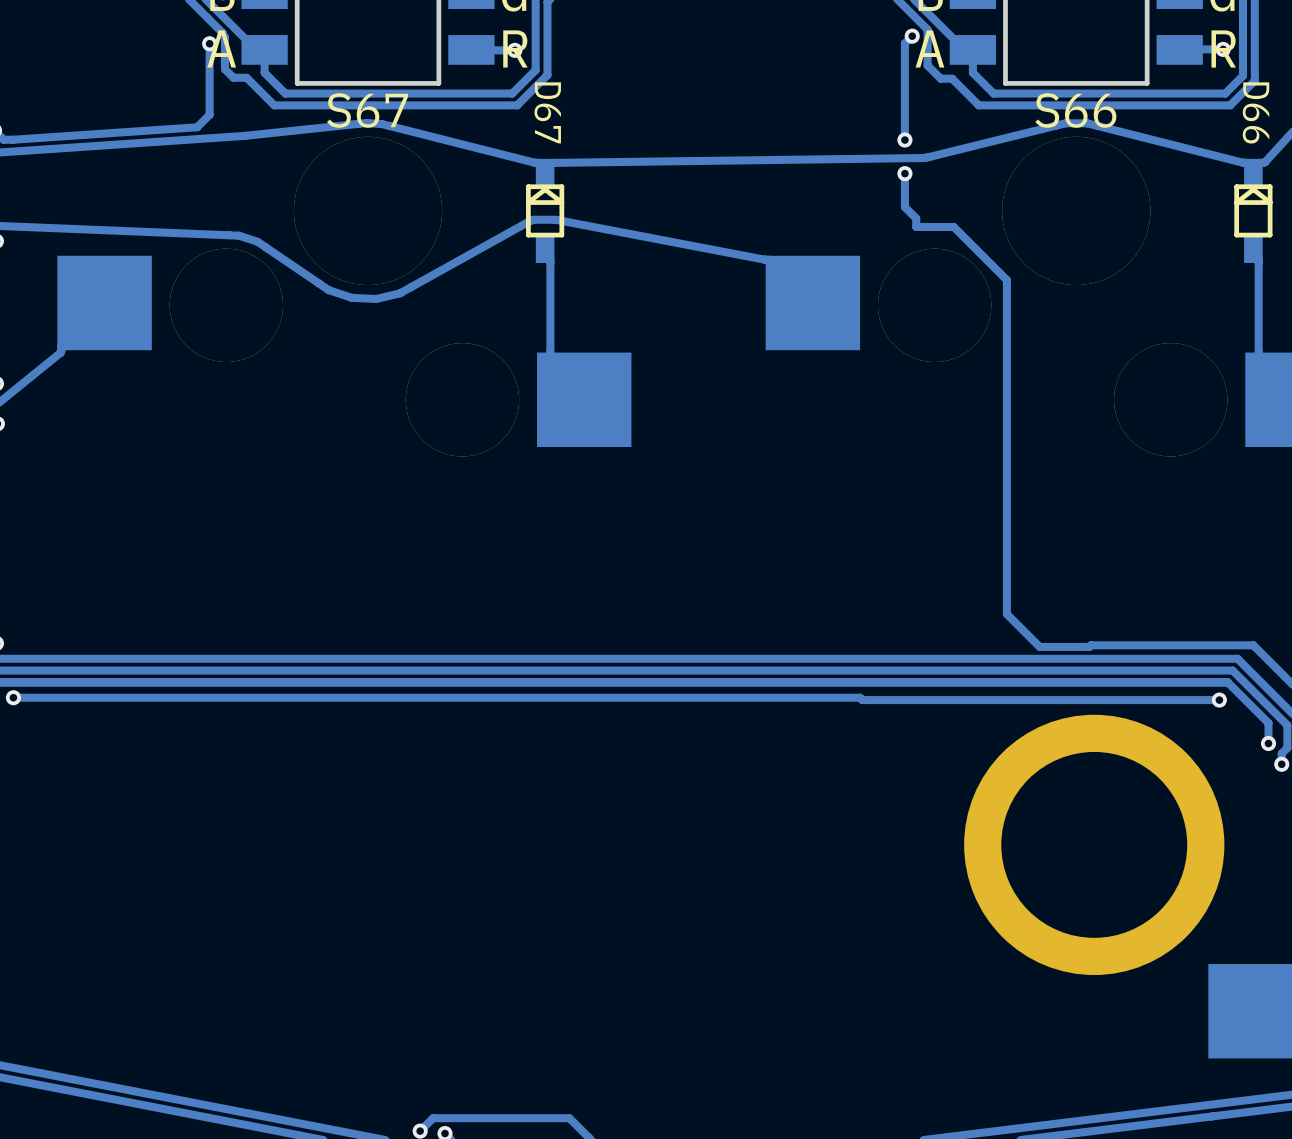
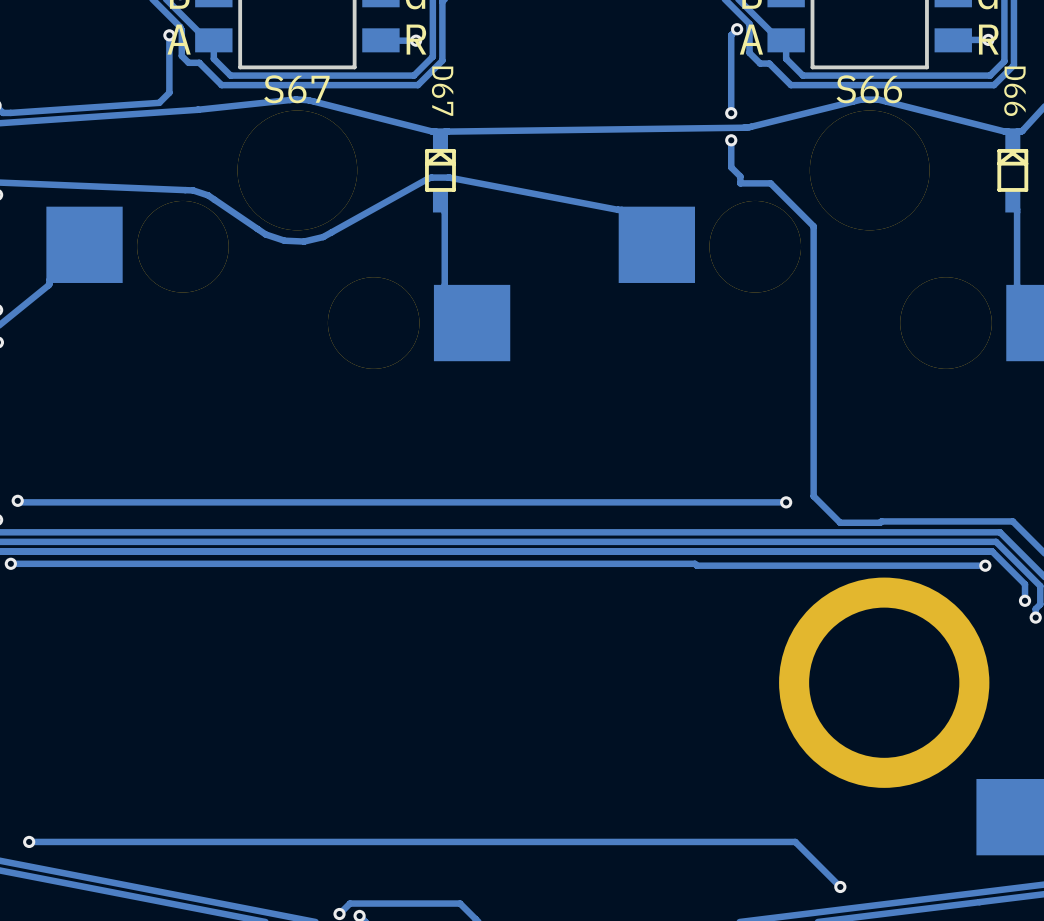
track: none -> (17, 500) (19, 502) (786, 502)
via: none -> (17, 500)
via: none -> (786, 502)
track: none -> (29, 841) (795, 841) (840, 886)
via: none -> (29, 841)
via: none -> (840, 886)

